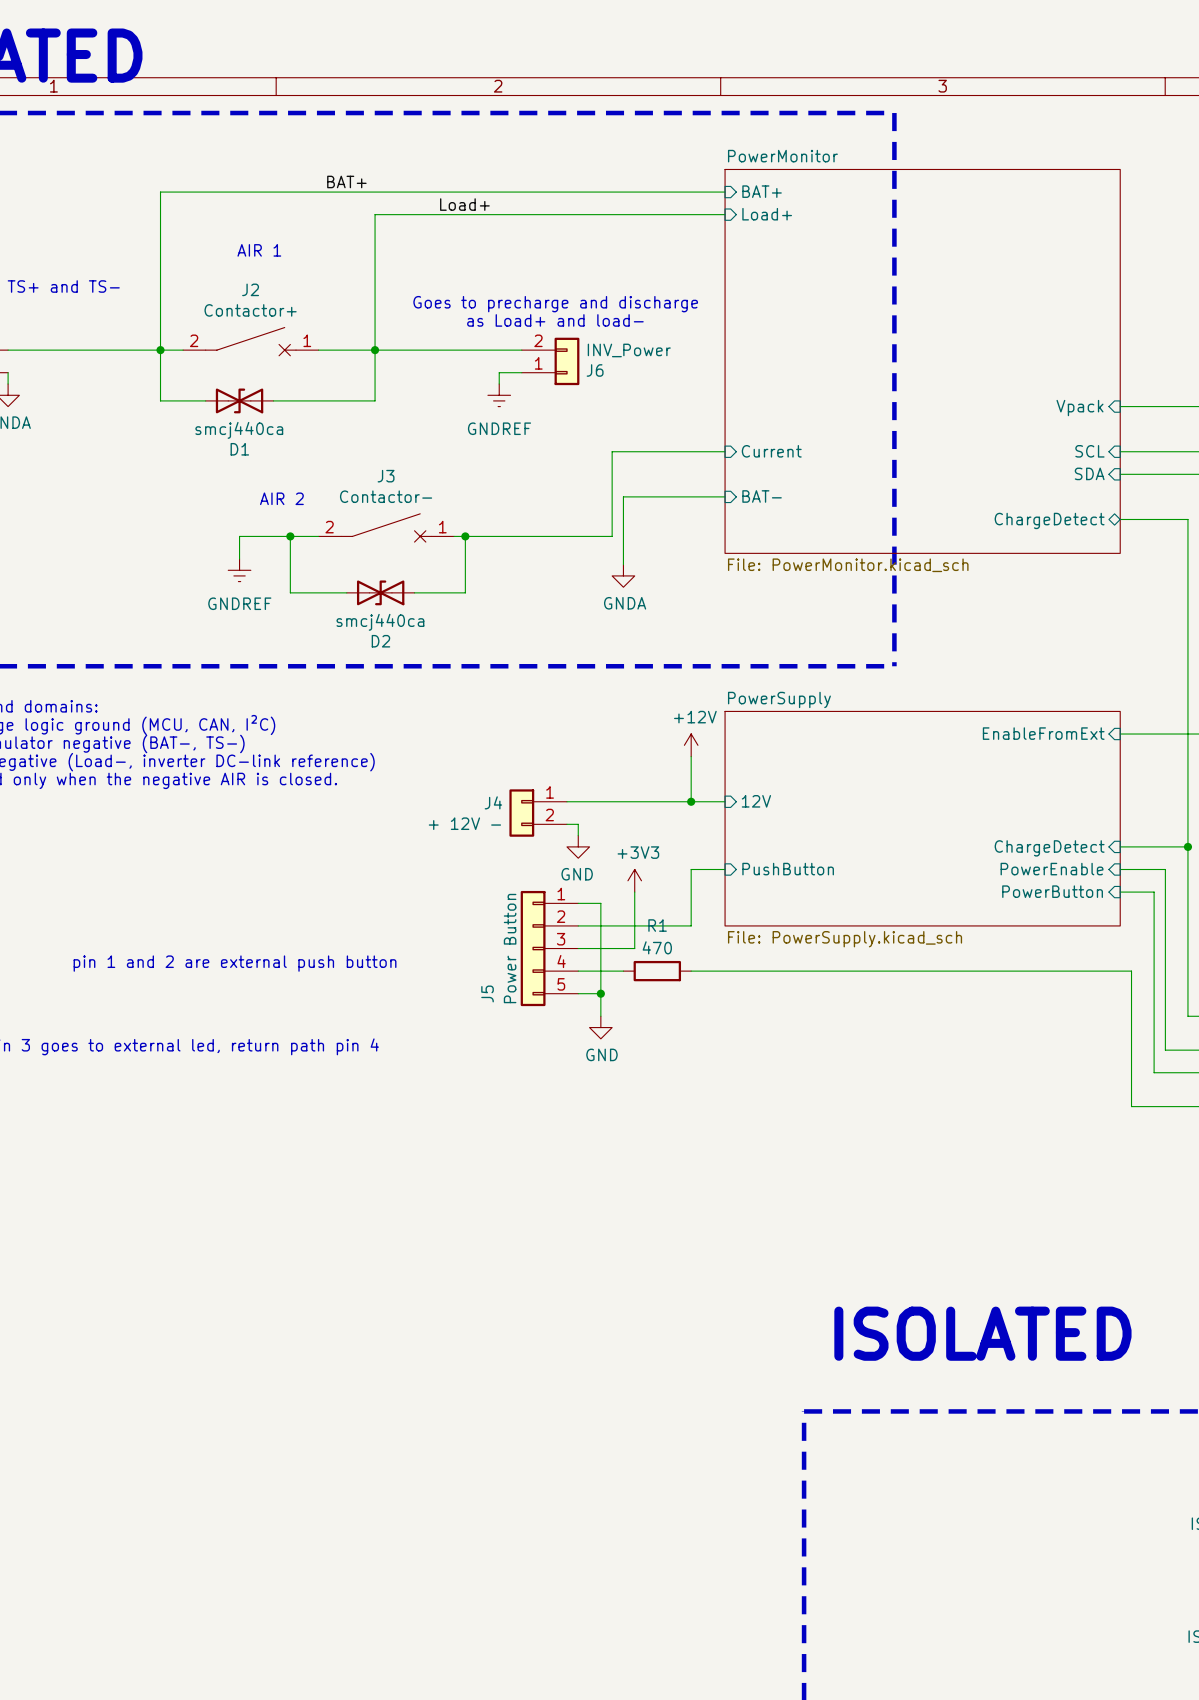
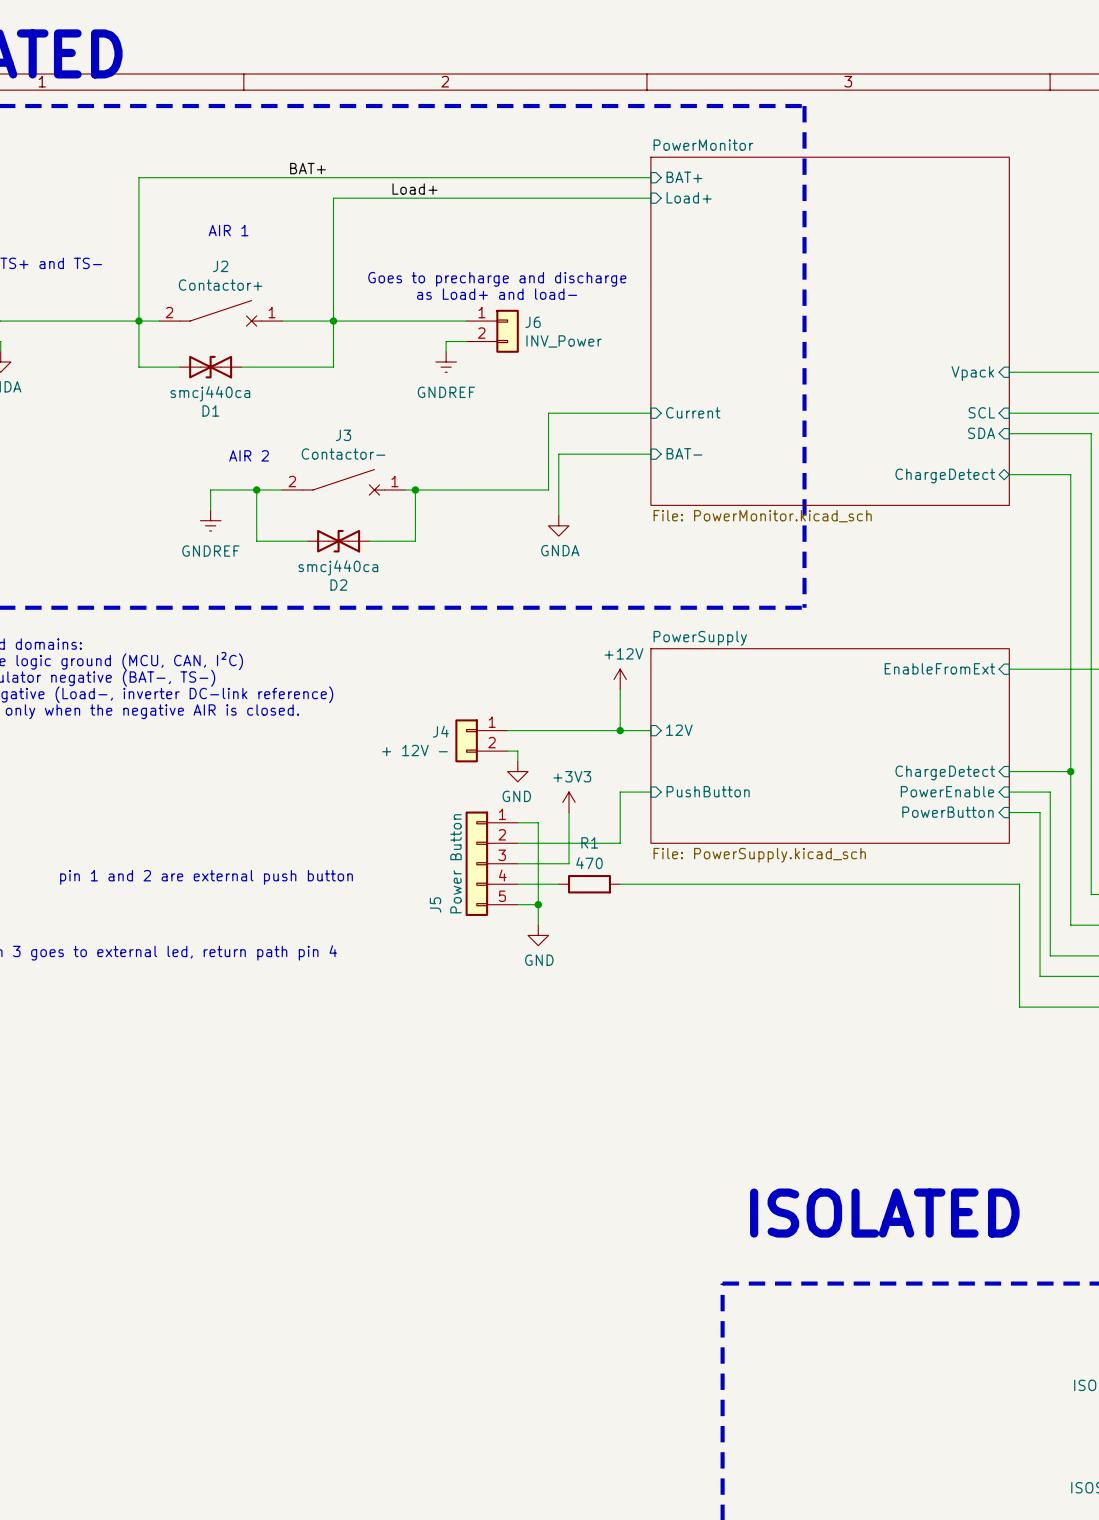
J6 flip: as is (566, 361) -> up-down (507, 331)

